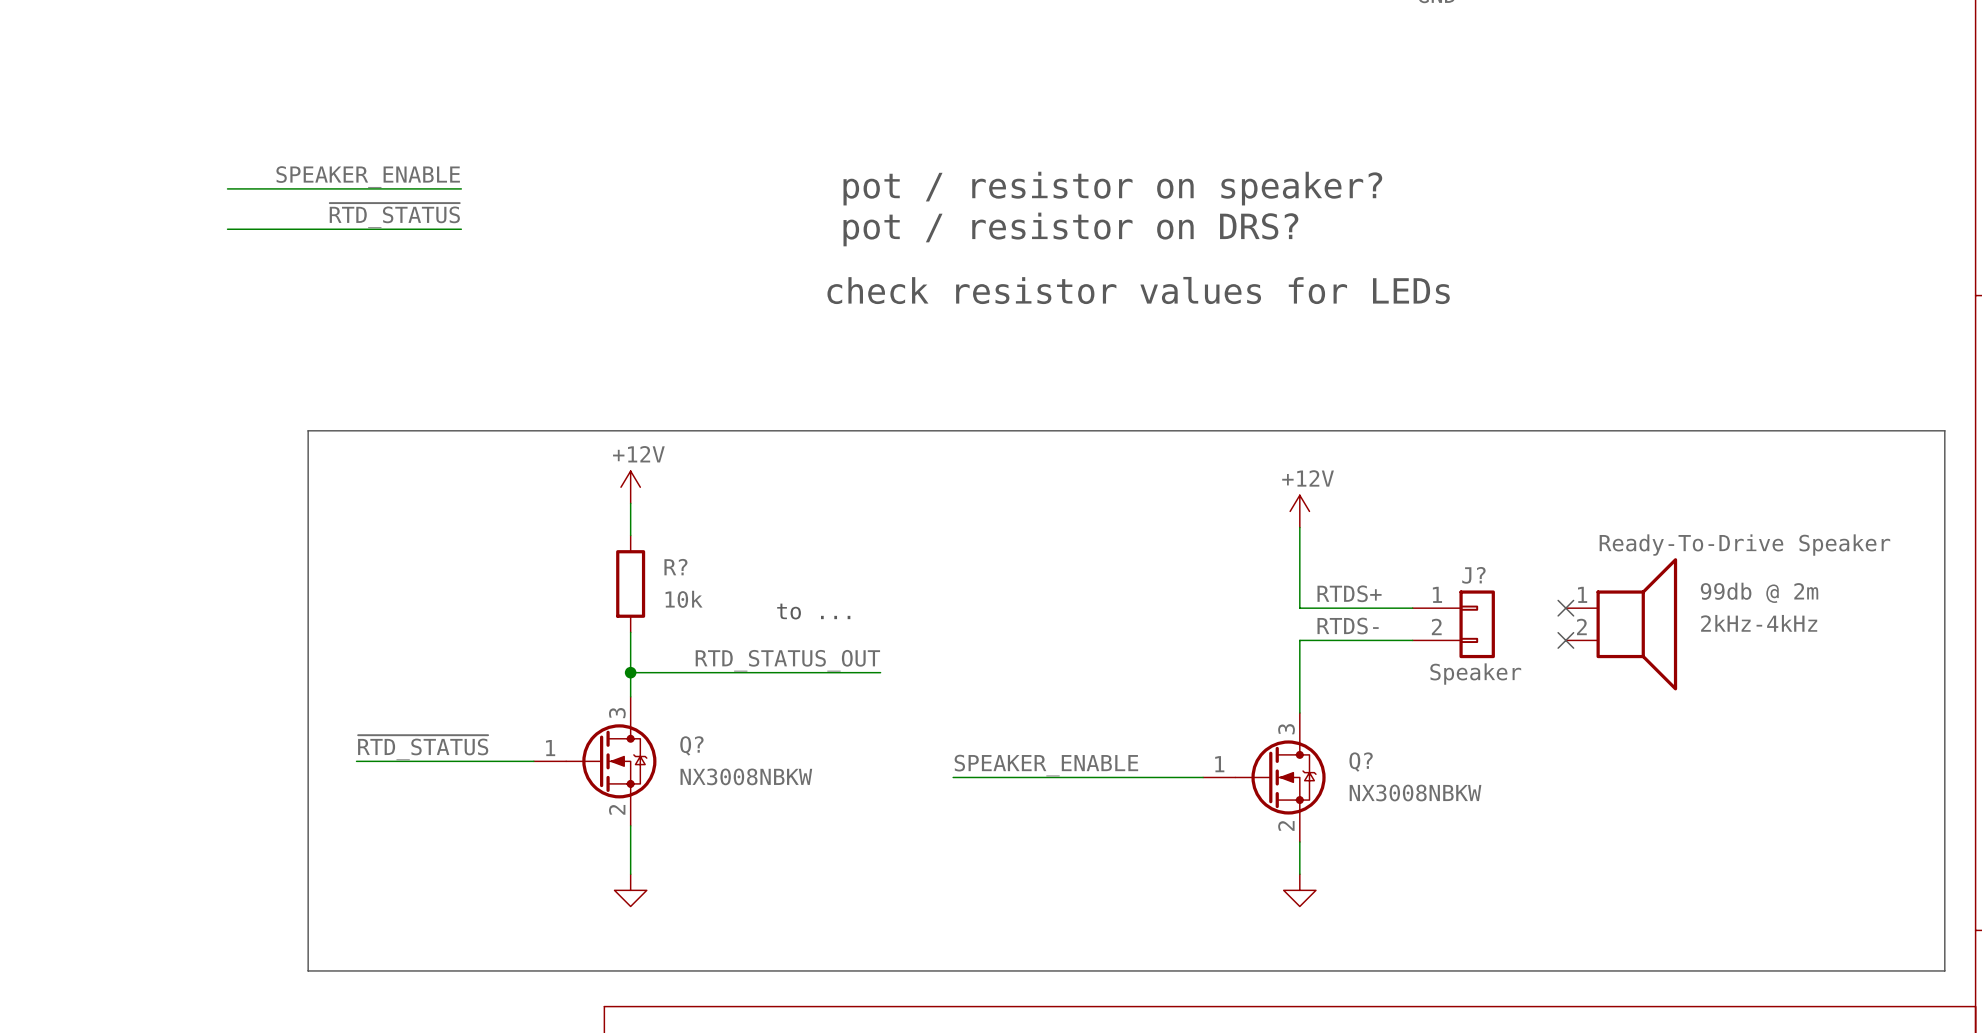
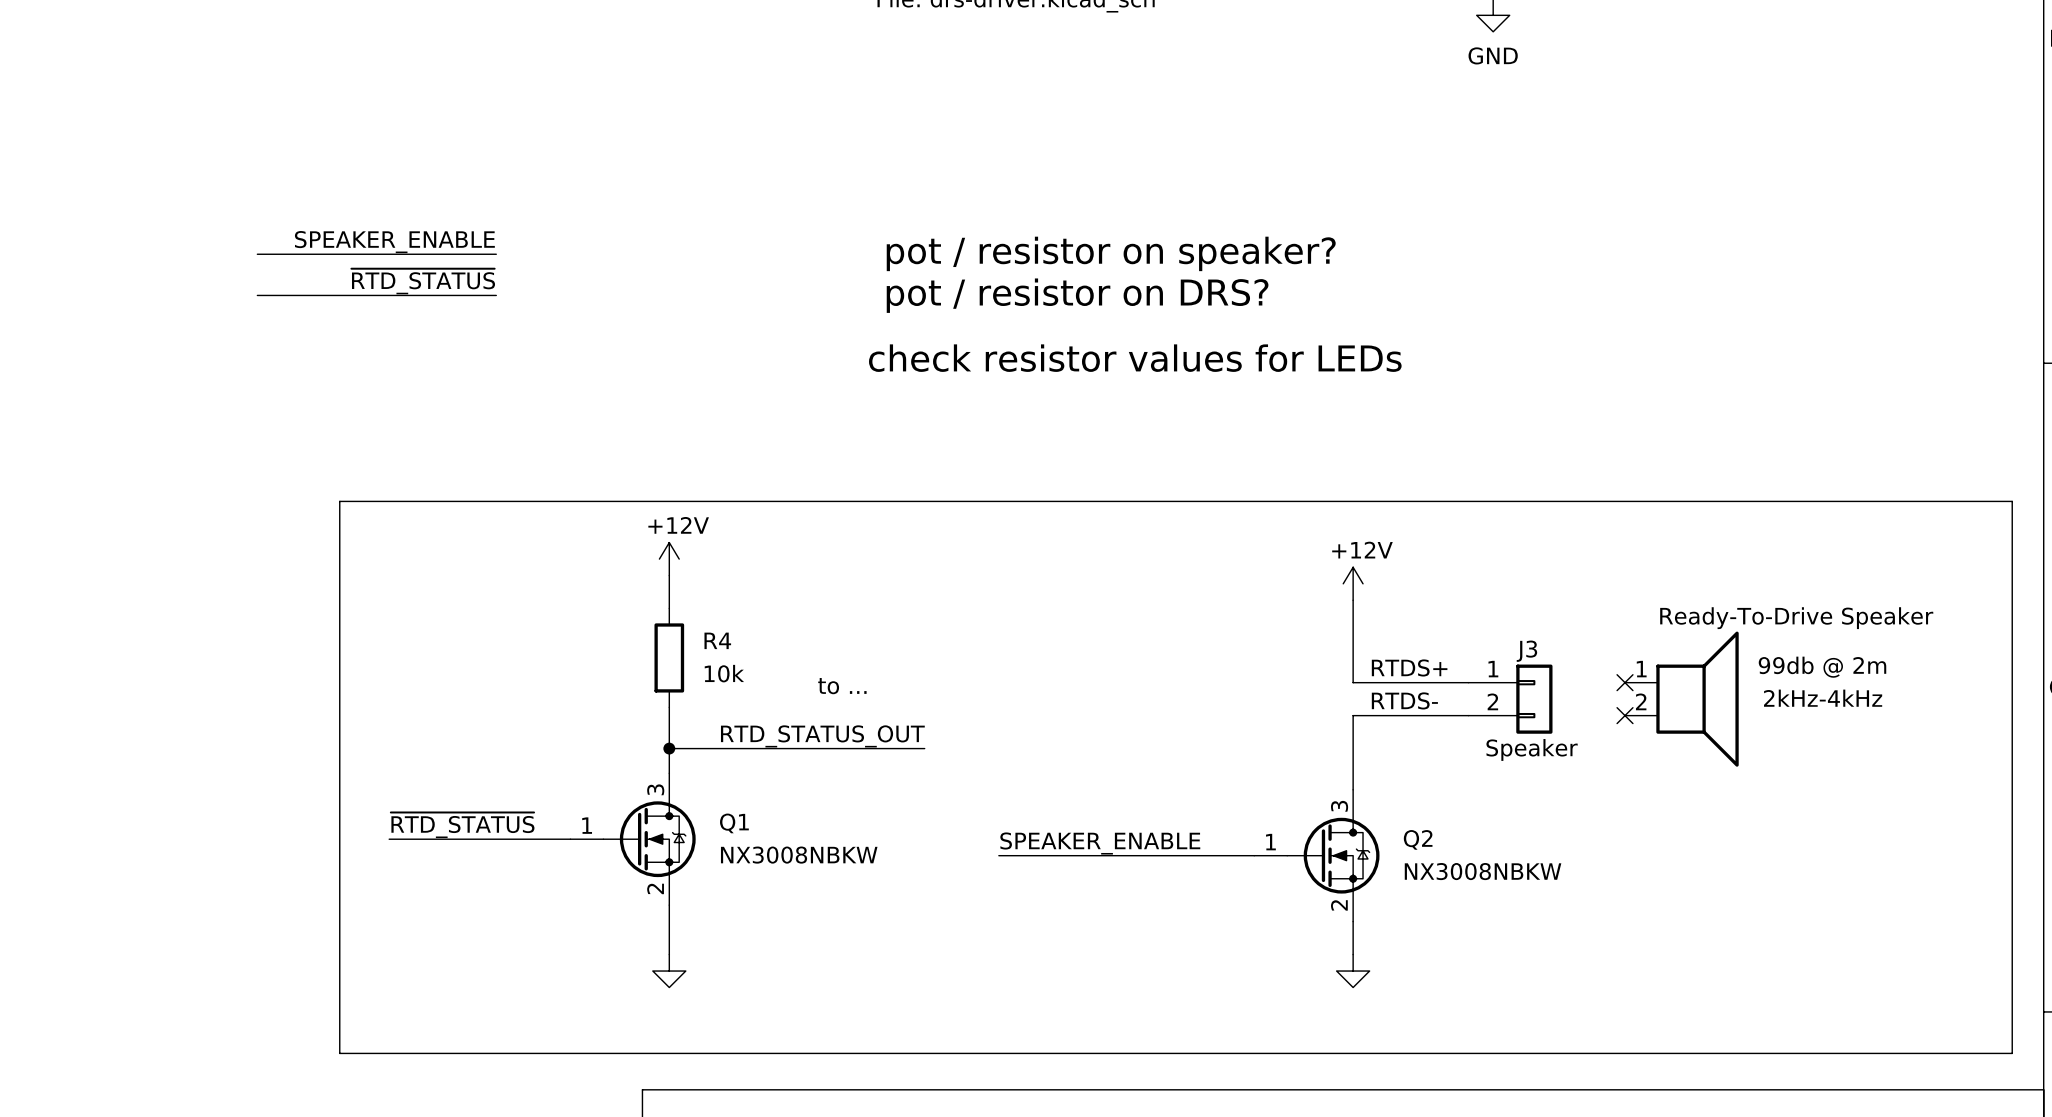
R? name: R? (675, 567) -> R4 (717, 640)
J? name: J? (1473, 575) -> J3 (1526, 651)
Q? name: Q? (691, 745) -> Q1 (734, 823)
Q? name: Q? (1361, 762) -> Q2 (1418, 839)

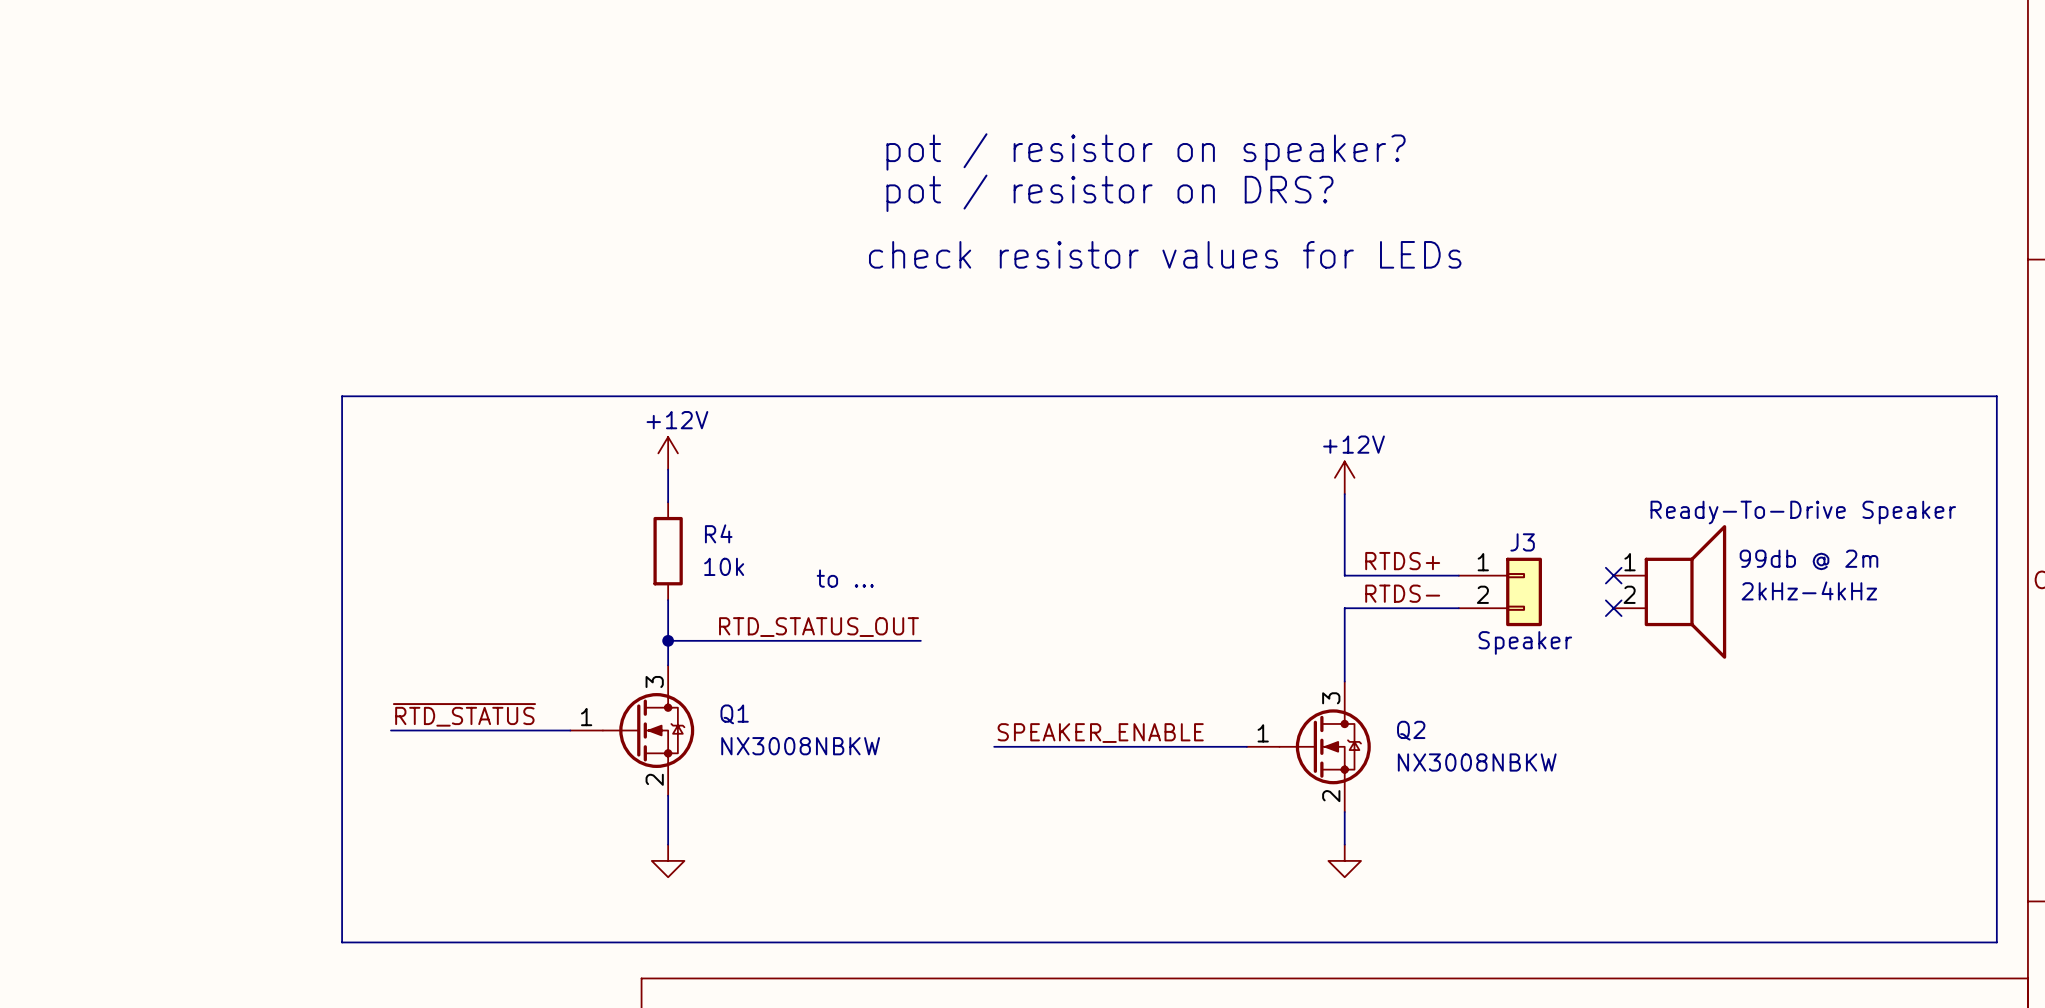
label: SPEAKER_ENABLE (394, 242) -> none
wire: (257, 254) (496, 254) -> none
label: ~{RTD_STATUS} (423, 281) -> none
wire: (257, 295) (496, 295) -> none

